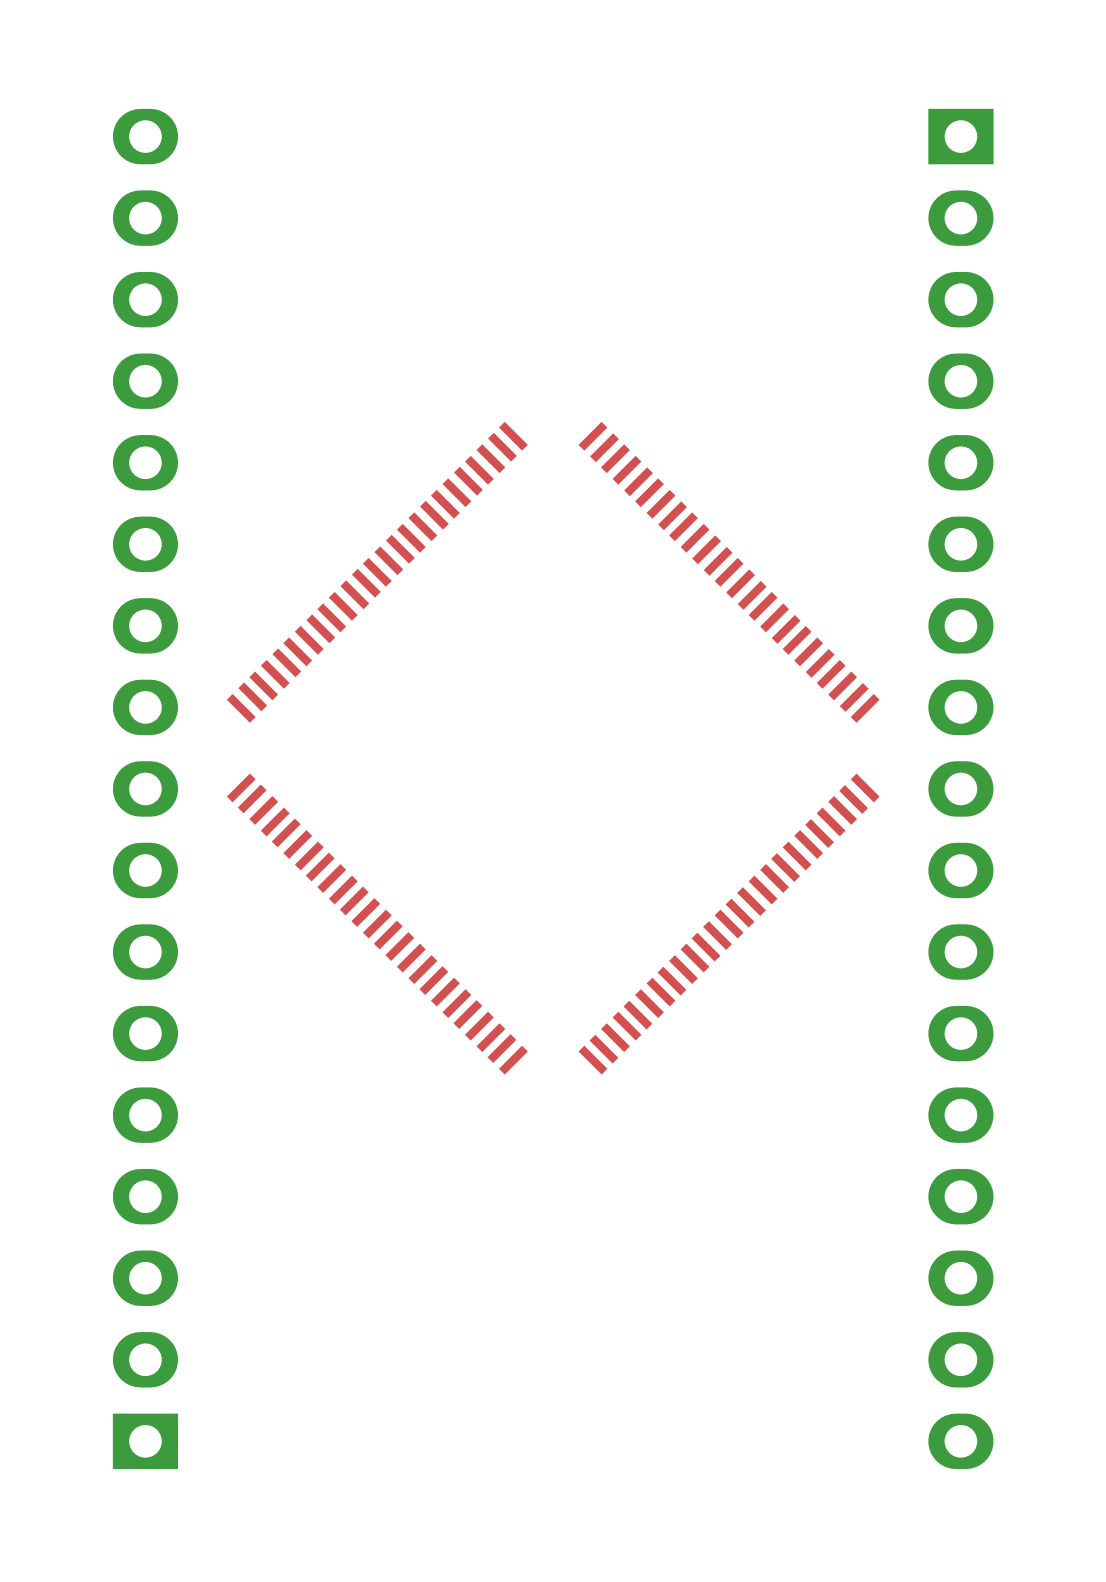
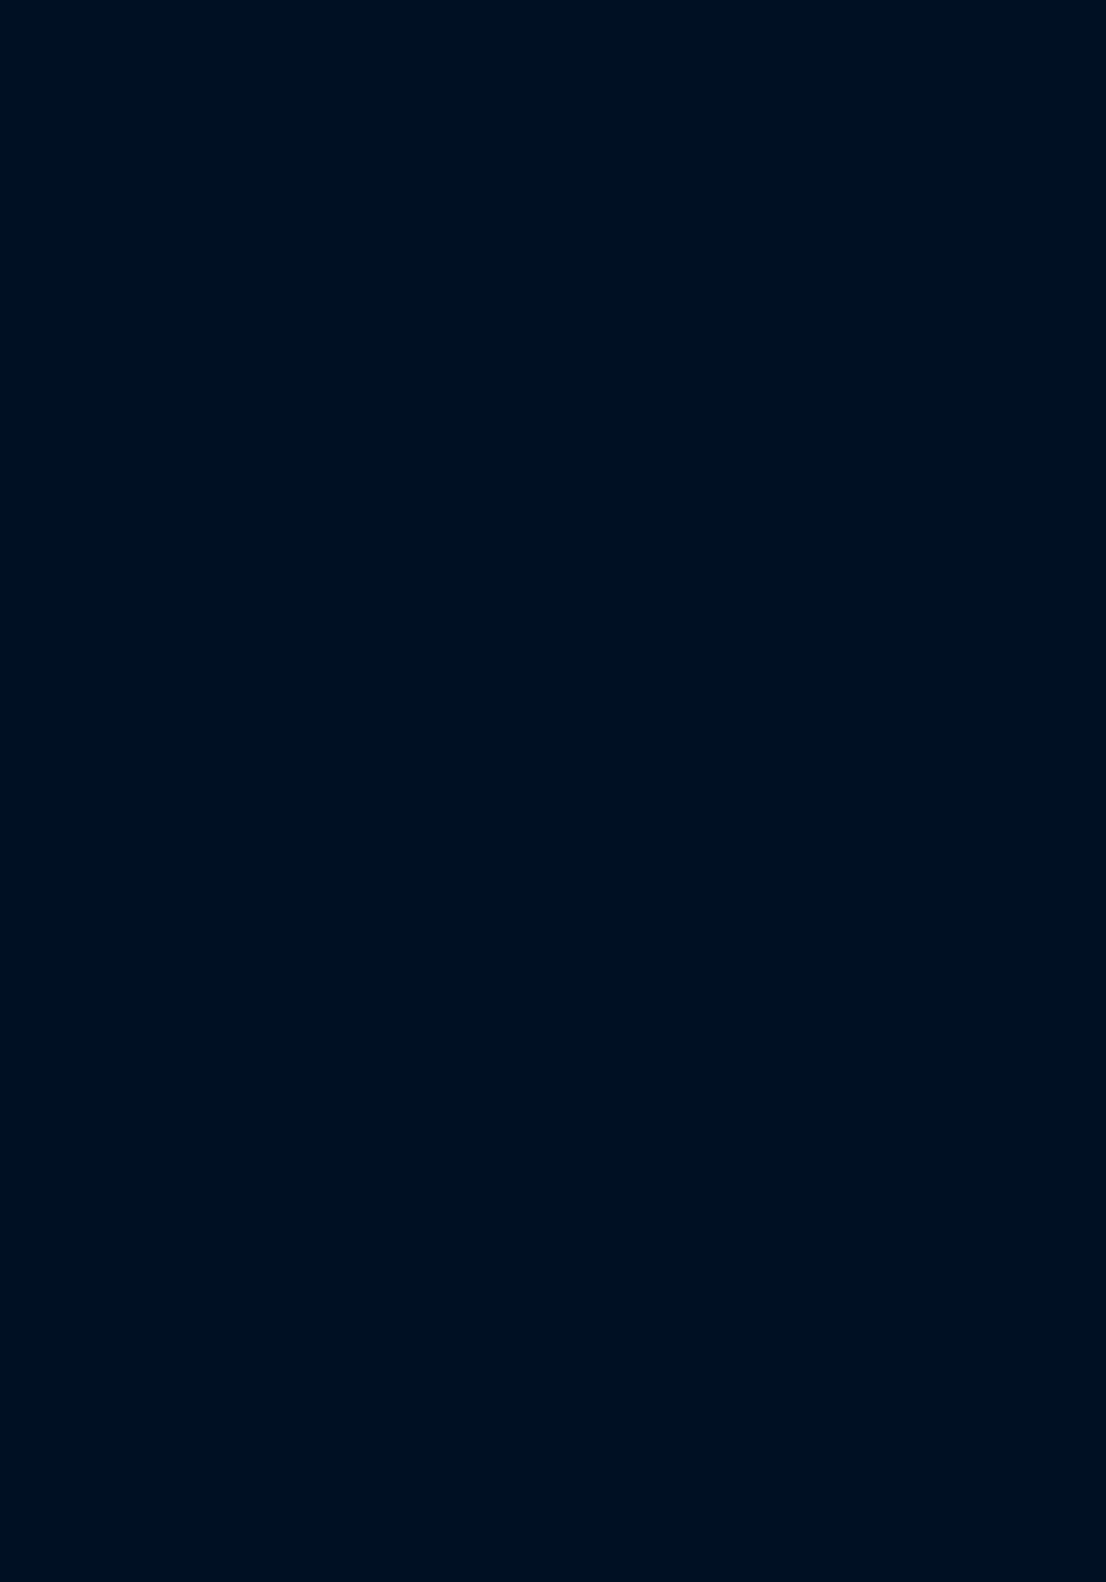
part: (553, 748) -> none
part: (145, 788) -> none
part: (960, 788) -> none

